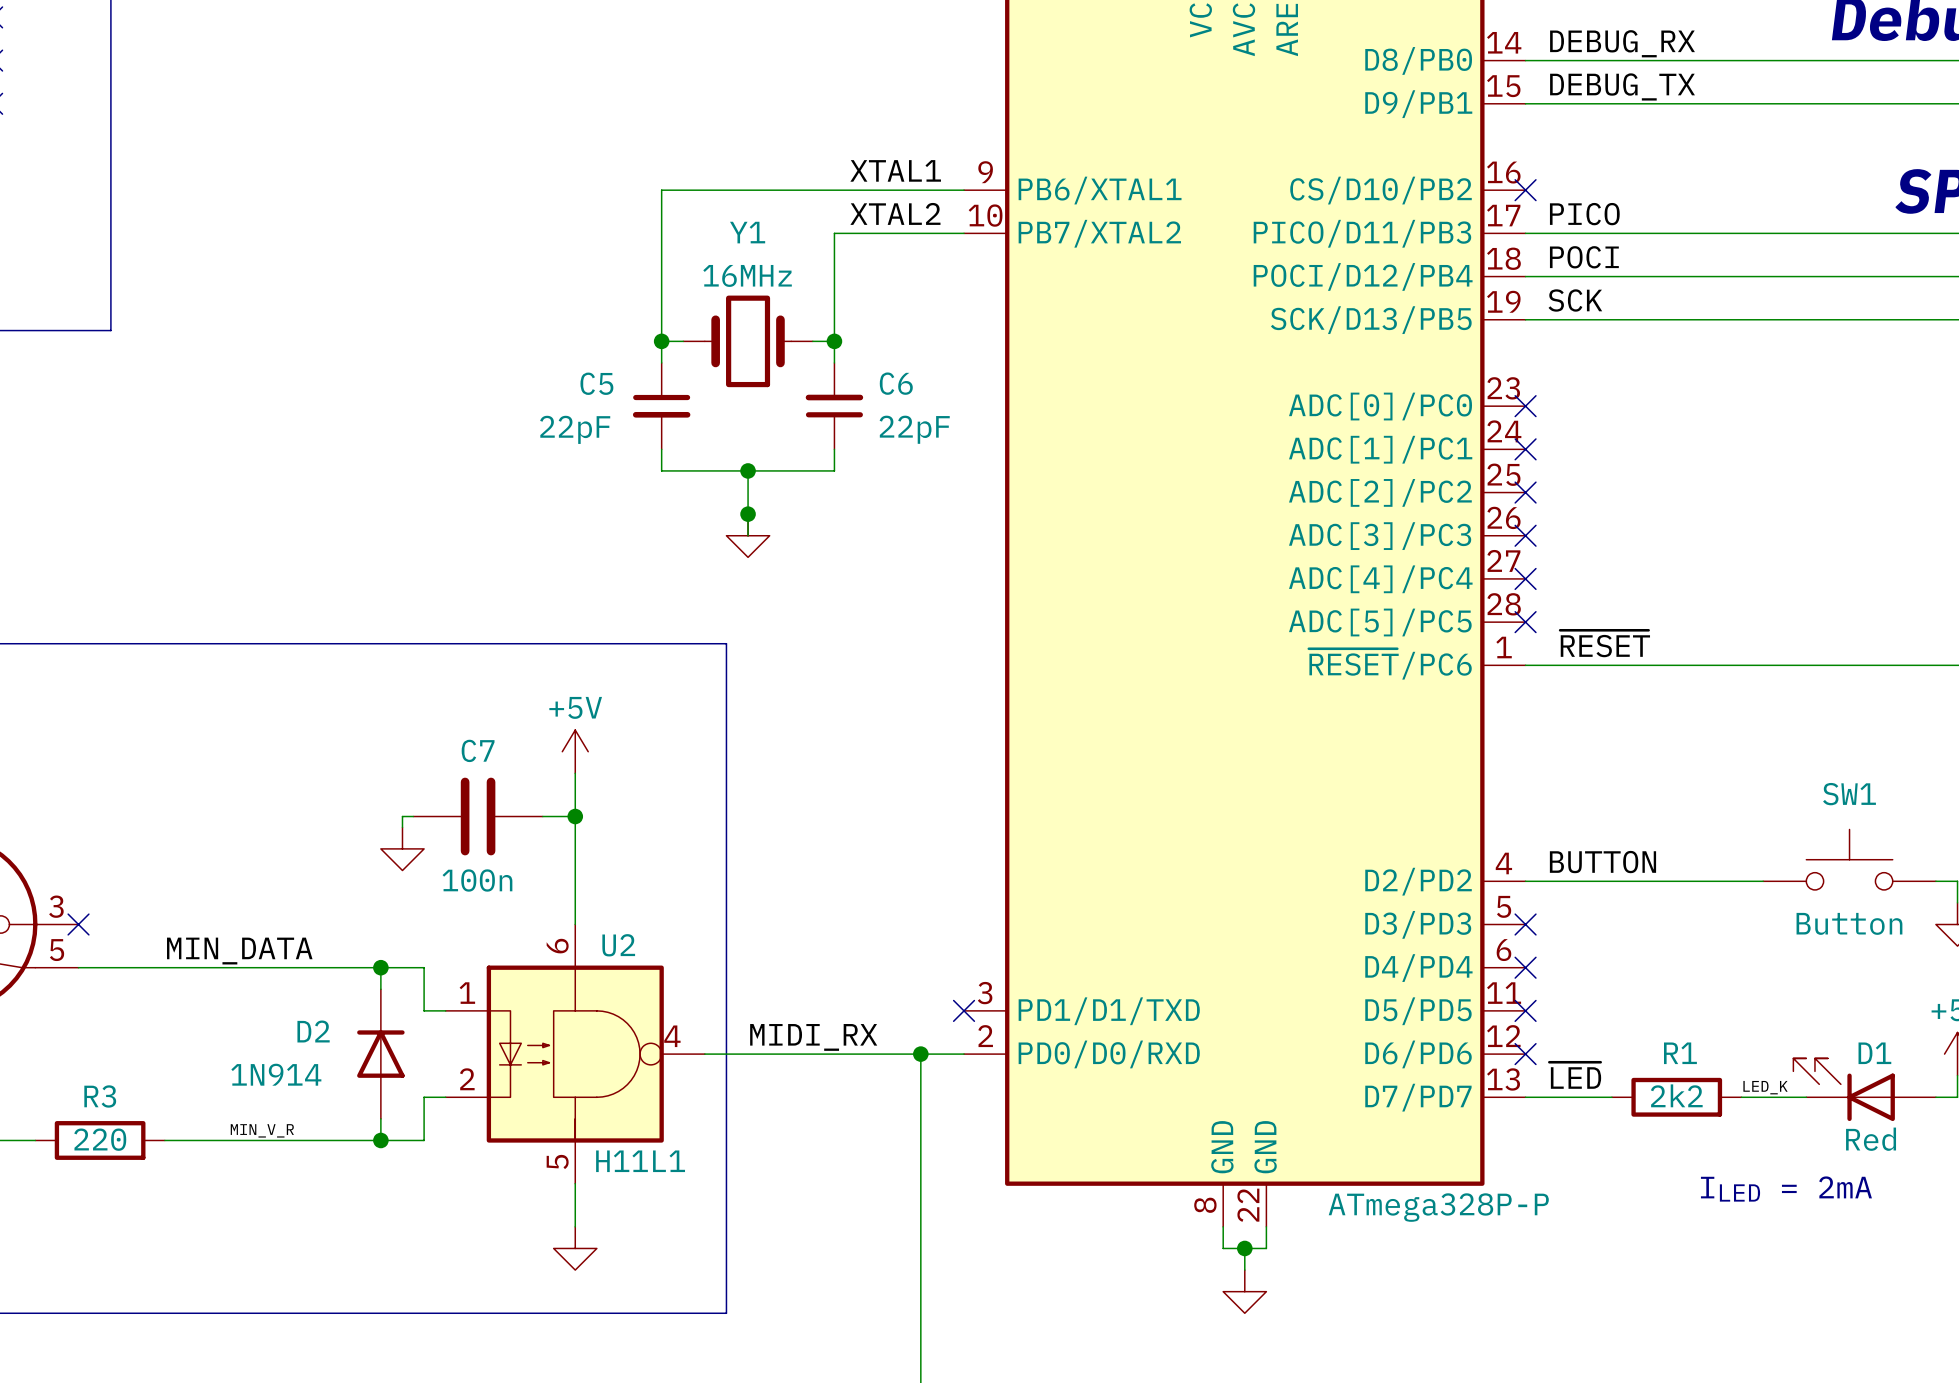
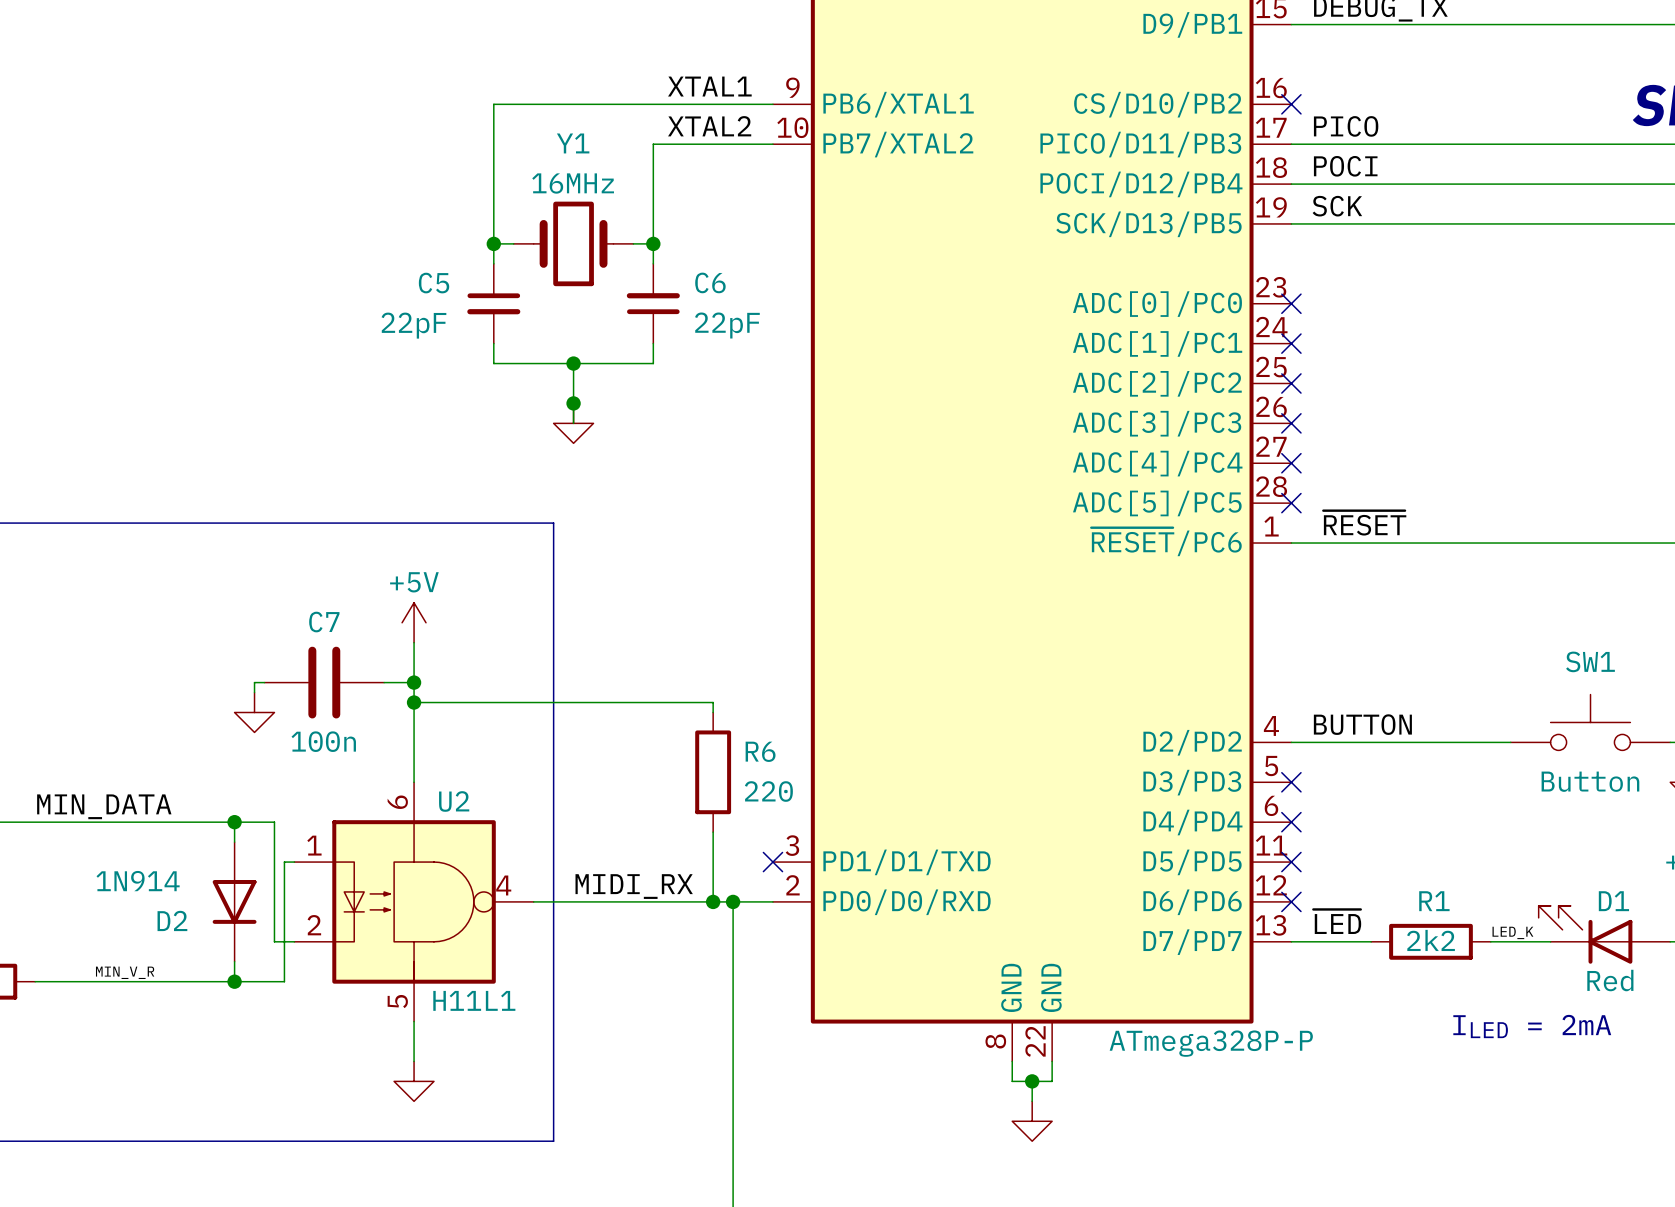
wire: none -> (414, 702) (713, 702) (713, 712)
junction: none -> (414, 702)
R6: none -> 220 (713, 772)
wire: none -> (713, 832) (713, 901)
wire: (424, 1010) (434, 1010) -> (274, 862) (274, 941)
D2 name position: D2 (313, 1031) -> D2 (172, 920)
D2 rotation: 0° (380, 1054) -> 180° (234, 901)
junction: none -> (713, 901)
D2 value position: 1N914 (276, 1074) -> 1N914 (138, 881)
wire: (424, 1097) (424, 1140) -> (284, 862) (284, 981) (274, 981)

